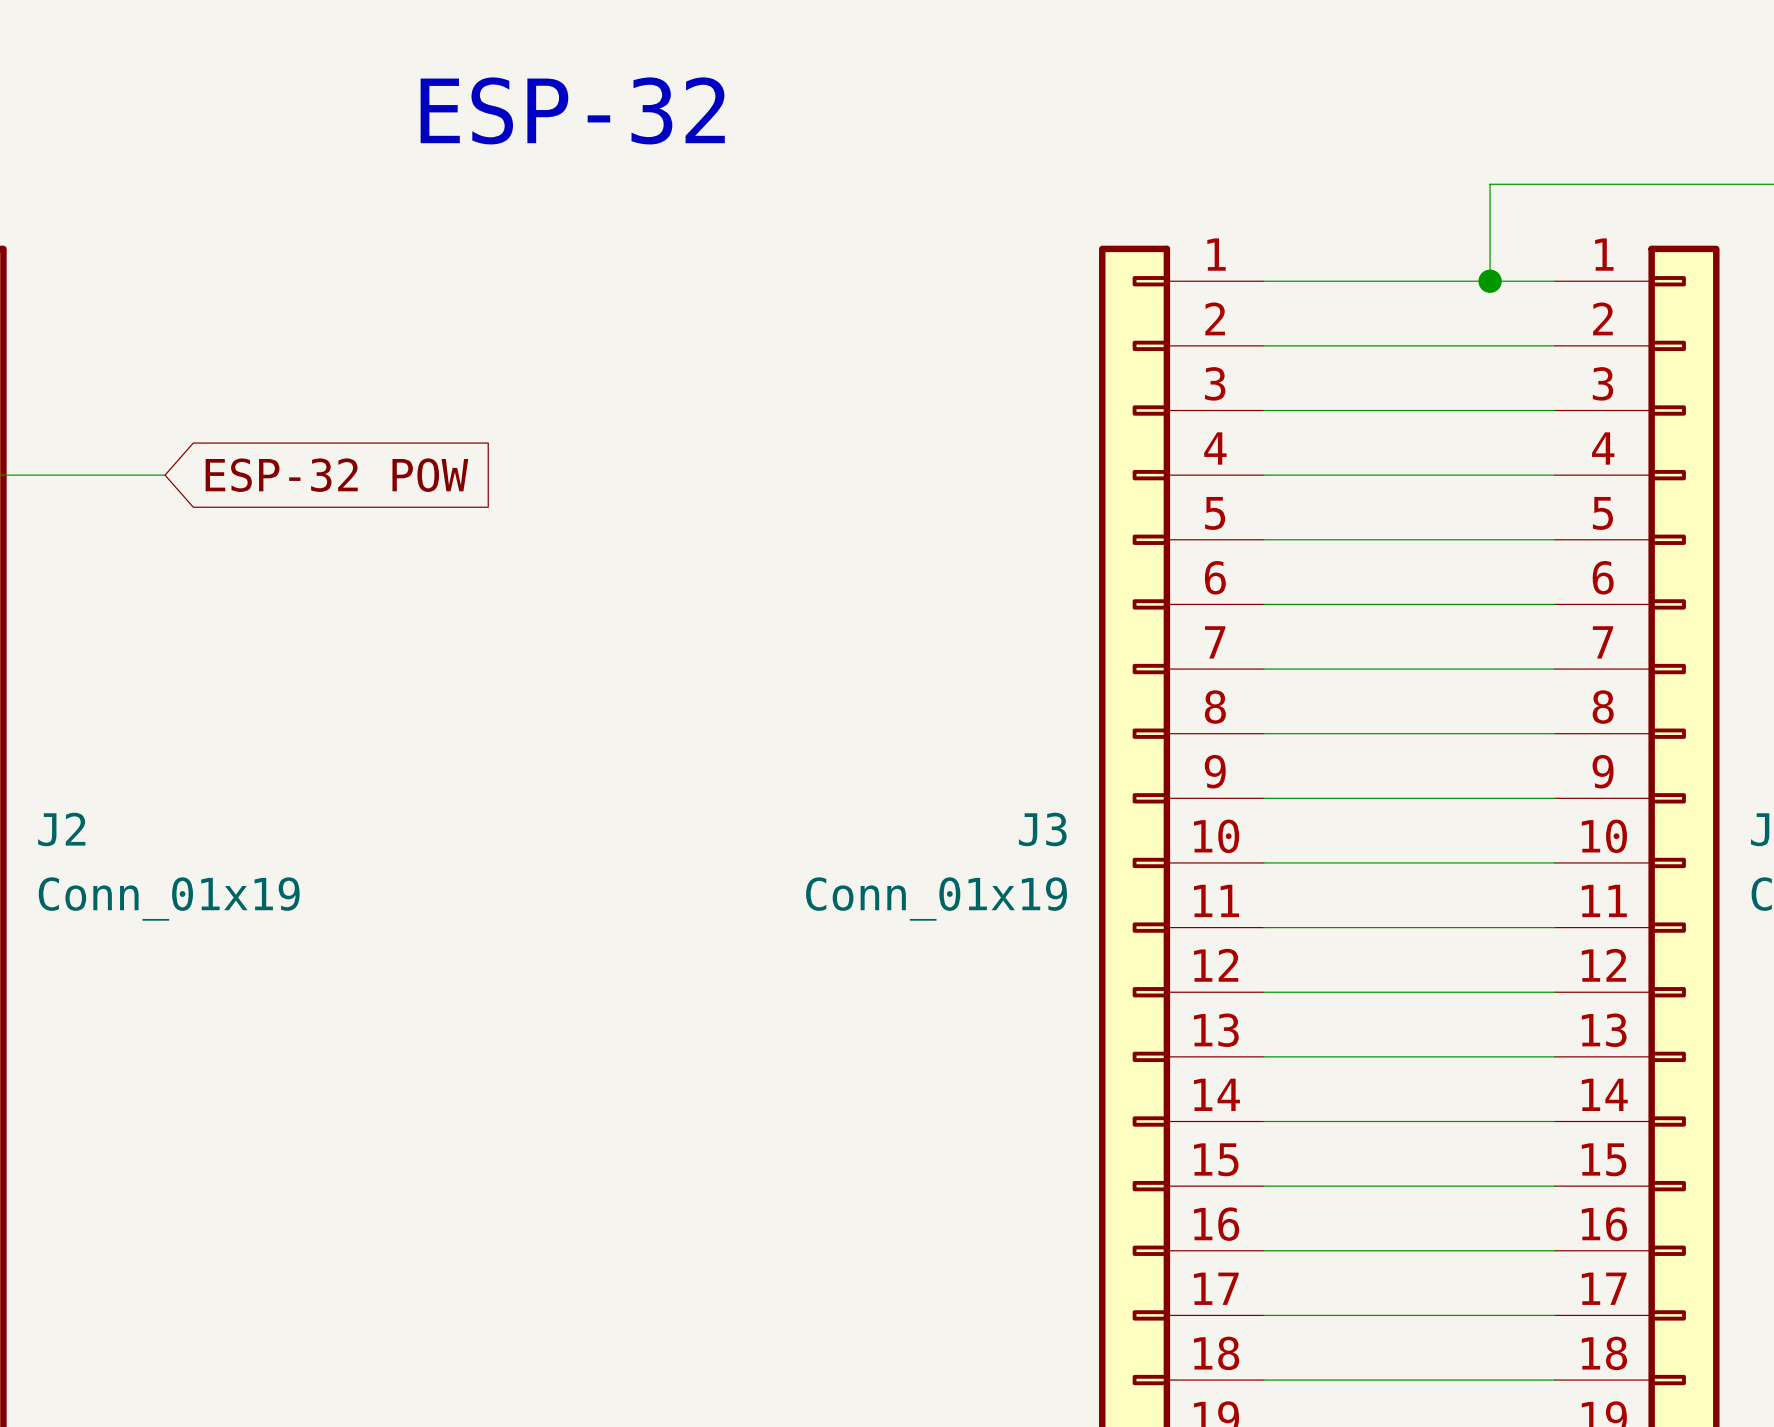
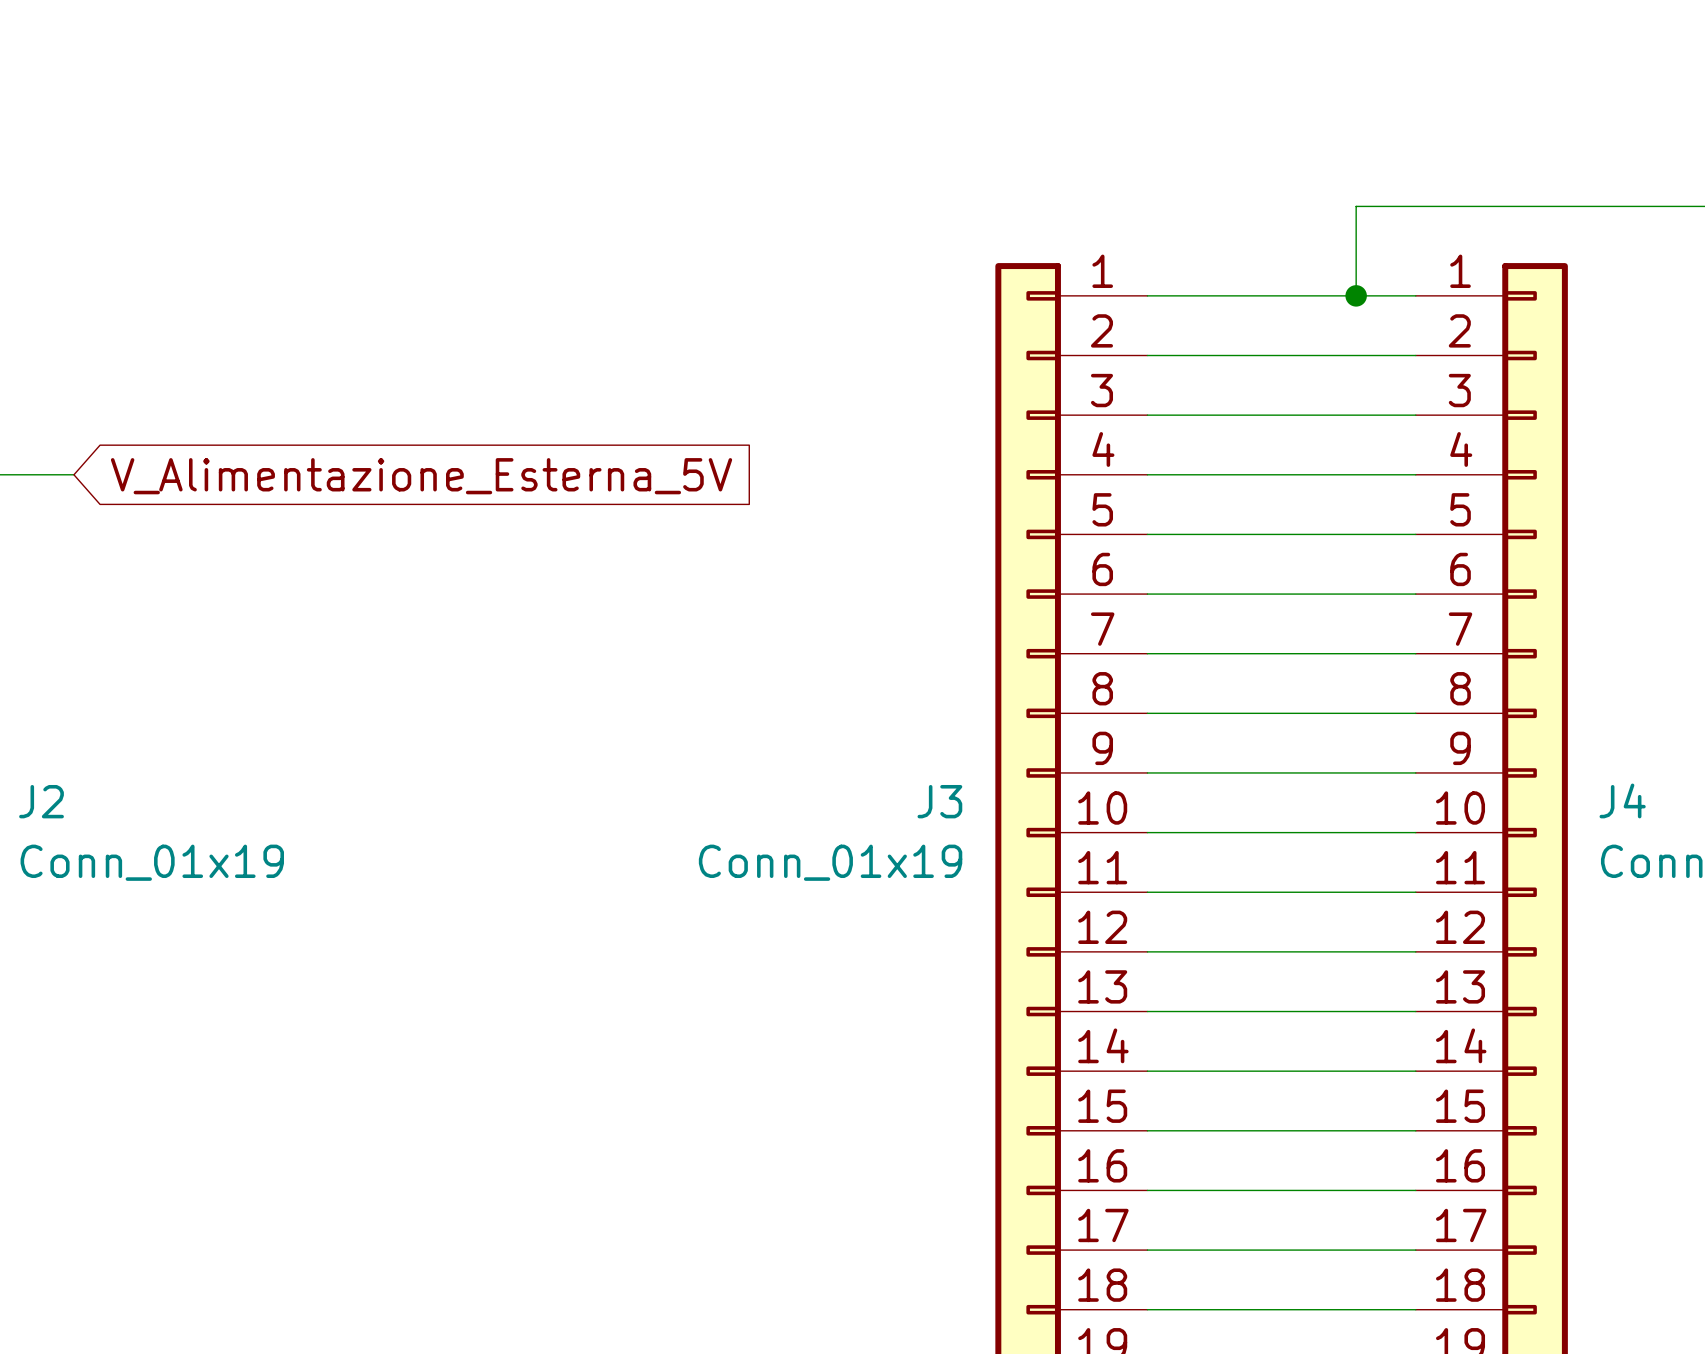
text: ESP-32 (572, 110) -> none
wire: (100, 475) (165, 475) -> none
global label: ESP-32 POW (336, 475) -> none
global label: none -> V_Alimentazione_Esterna_5V (421, 476)

